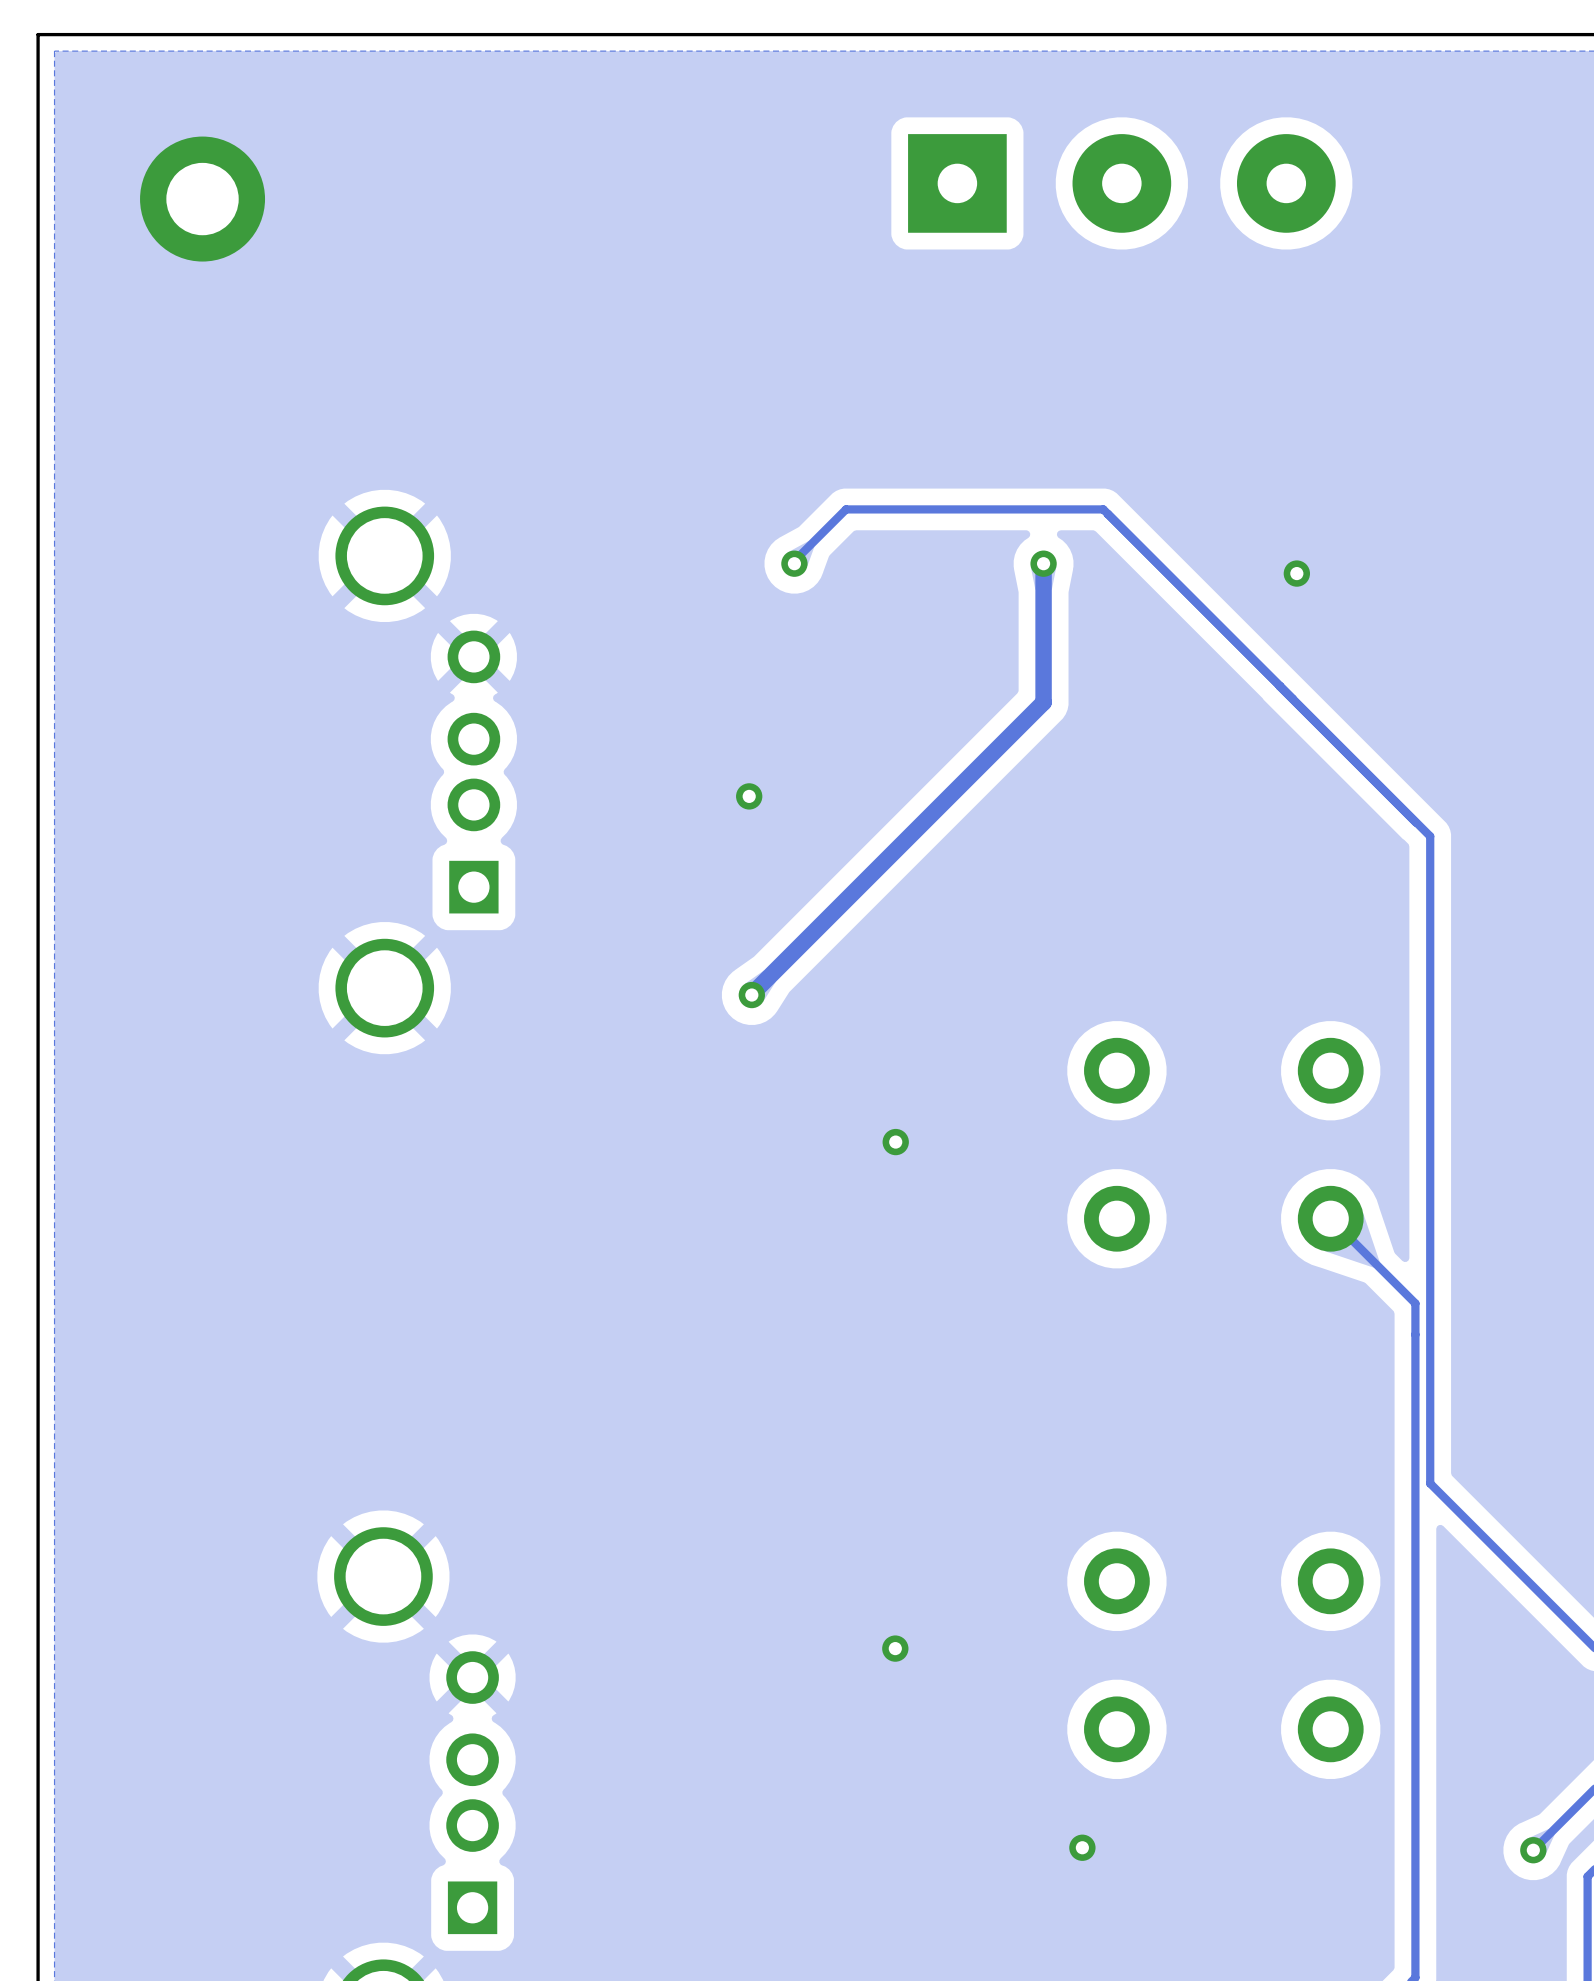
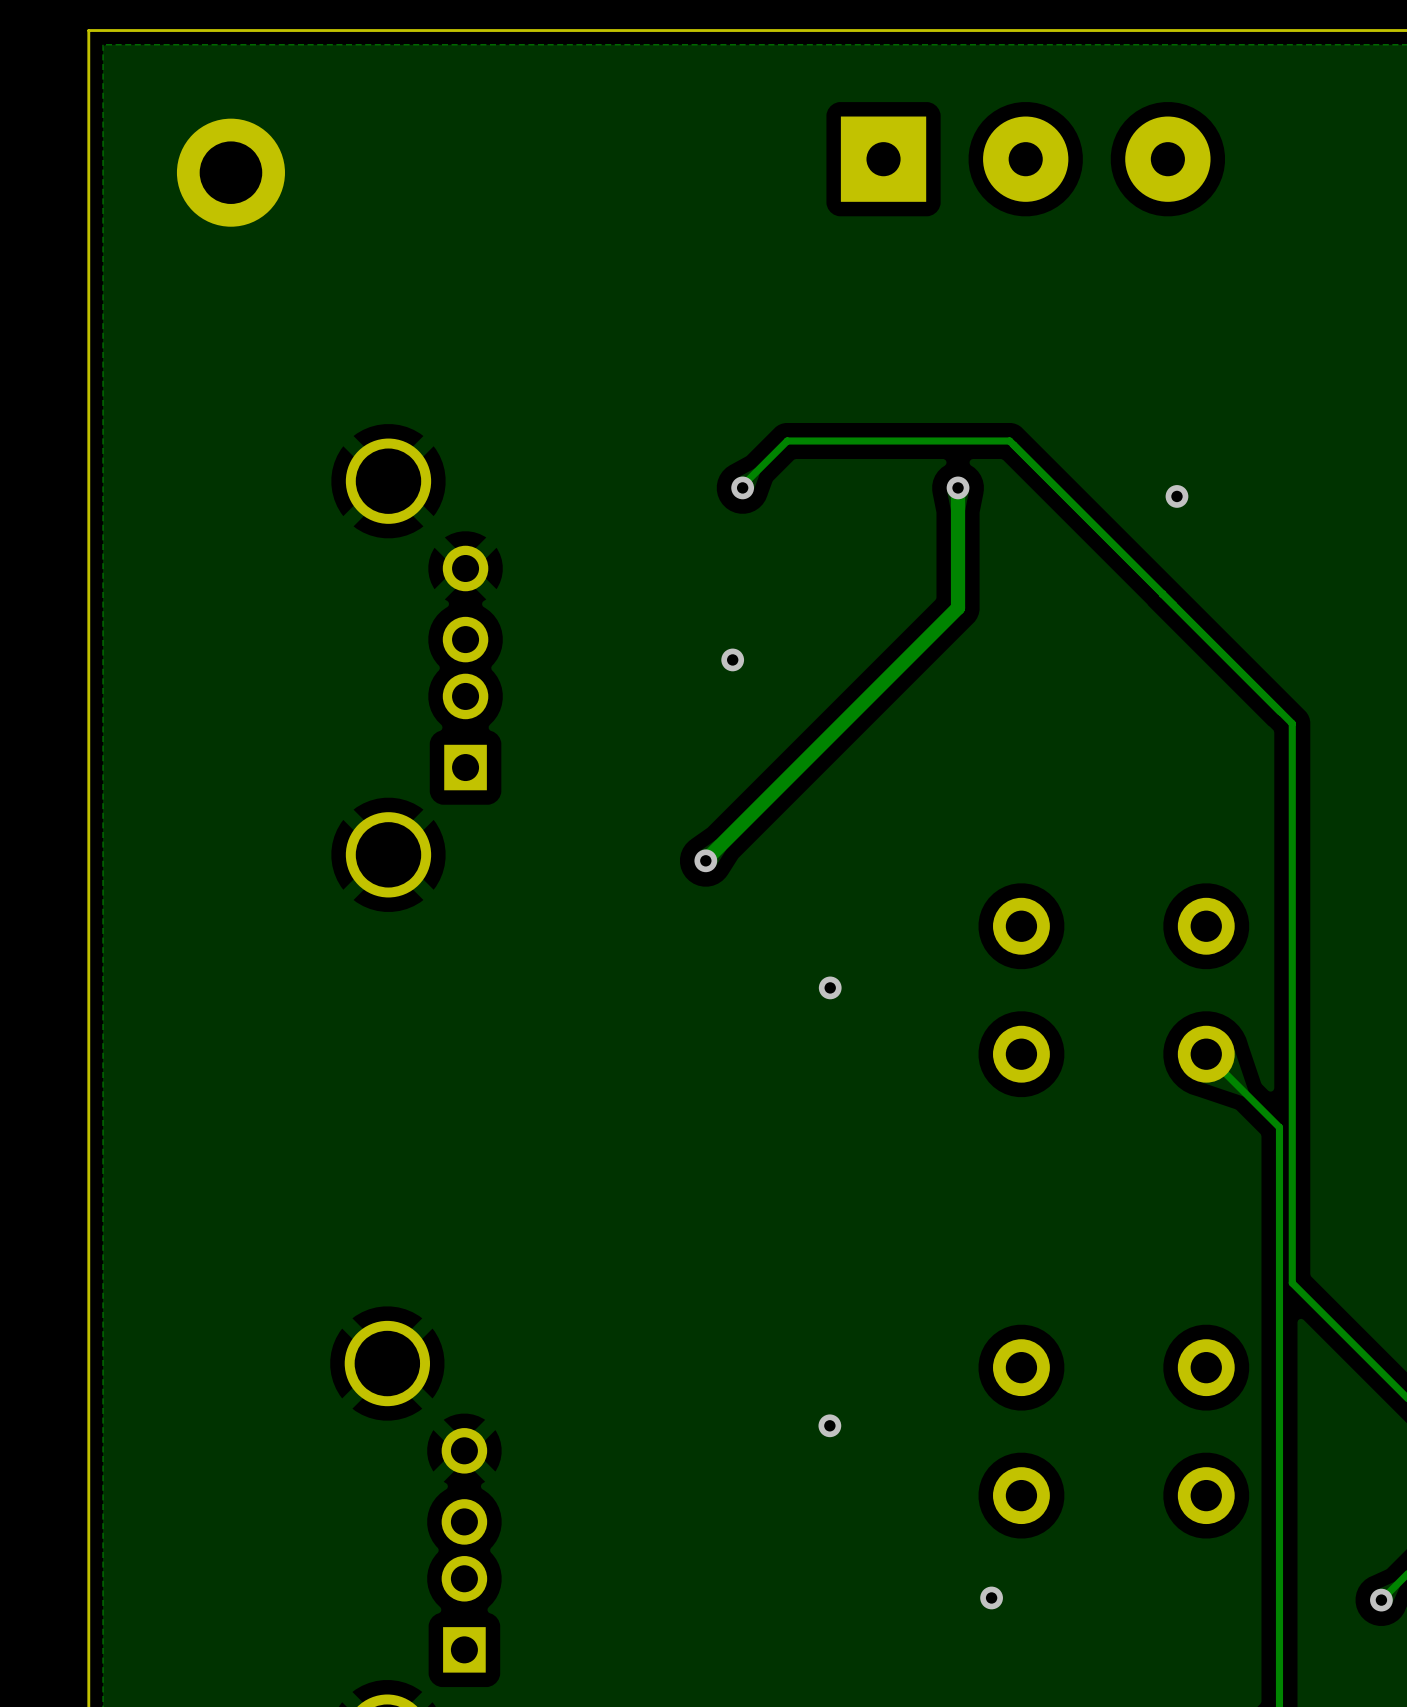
via position: (749, 796) -> (732, 659)

